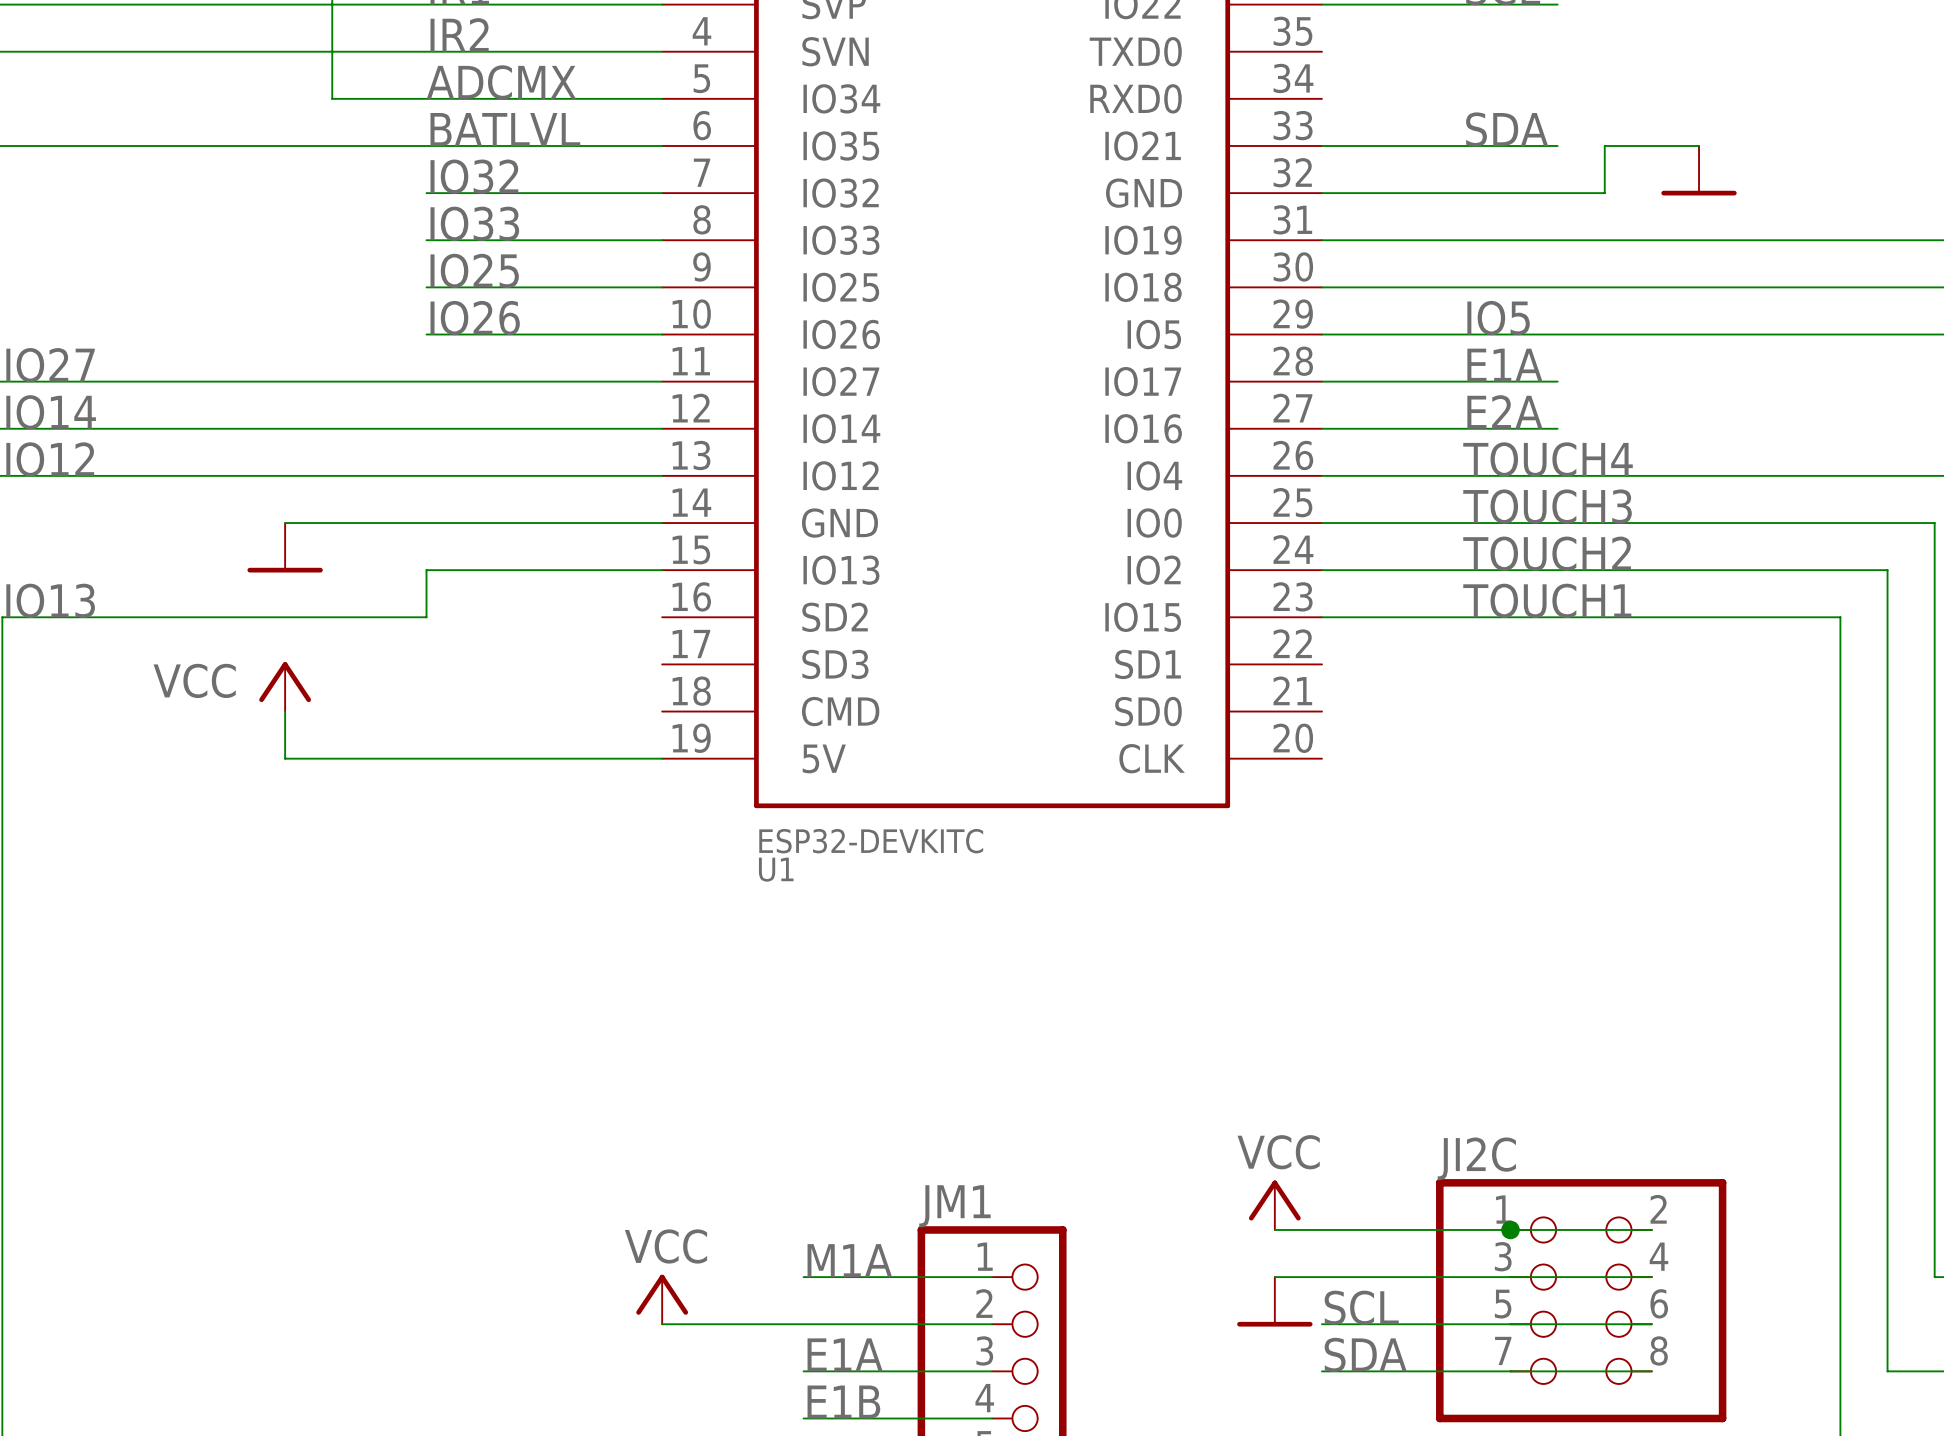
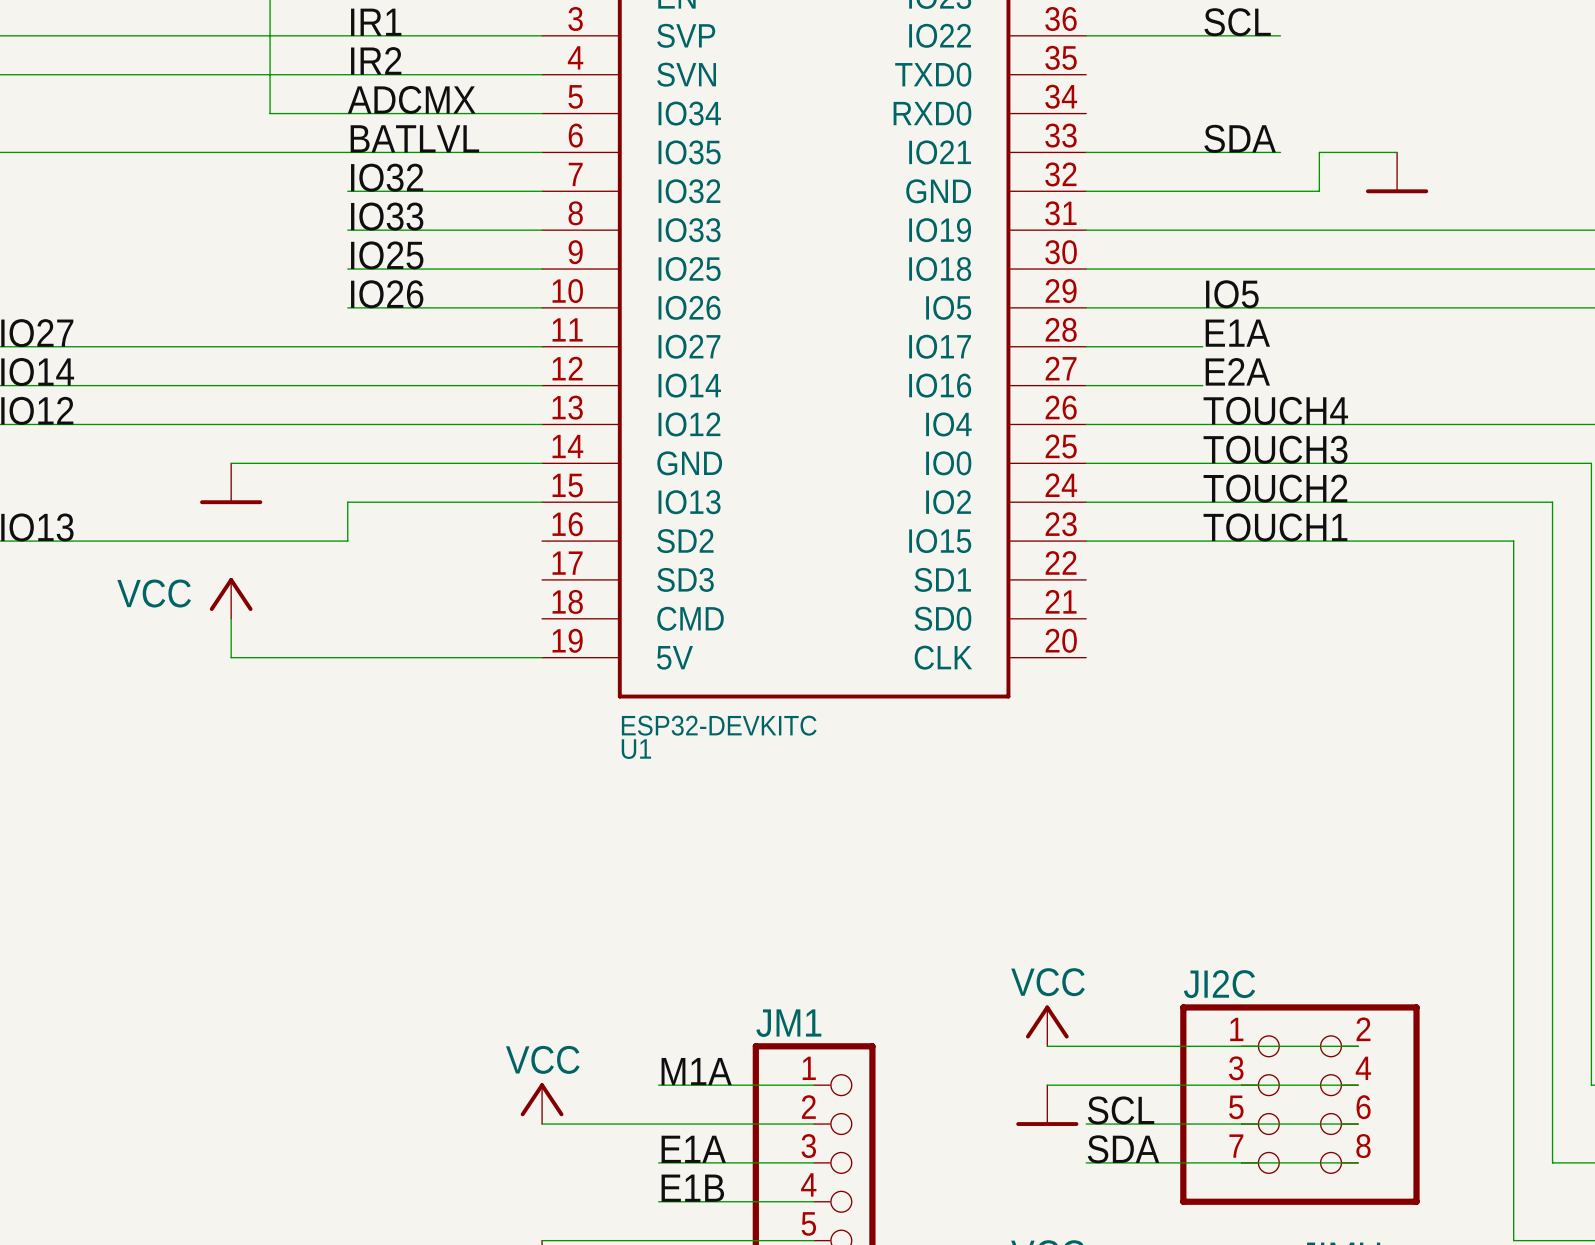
wire: (1463, 381) (1557, 381) -> none
wire: (1463, 428) (1557, 428) -> none
junction: (1510, 1229) -> none

